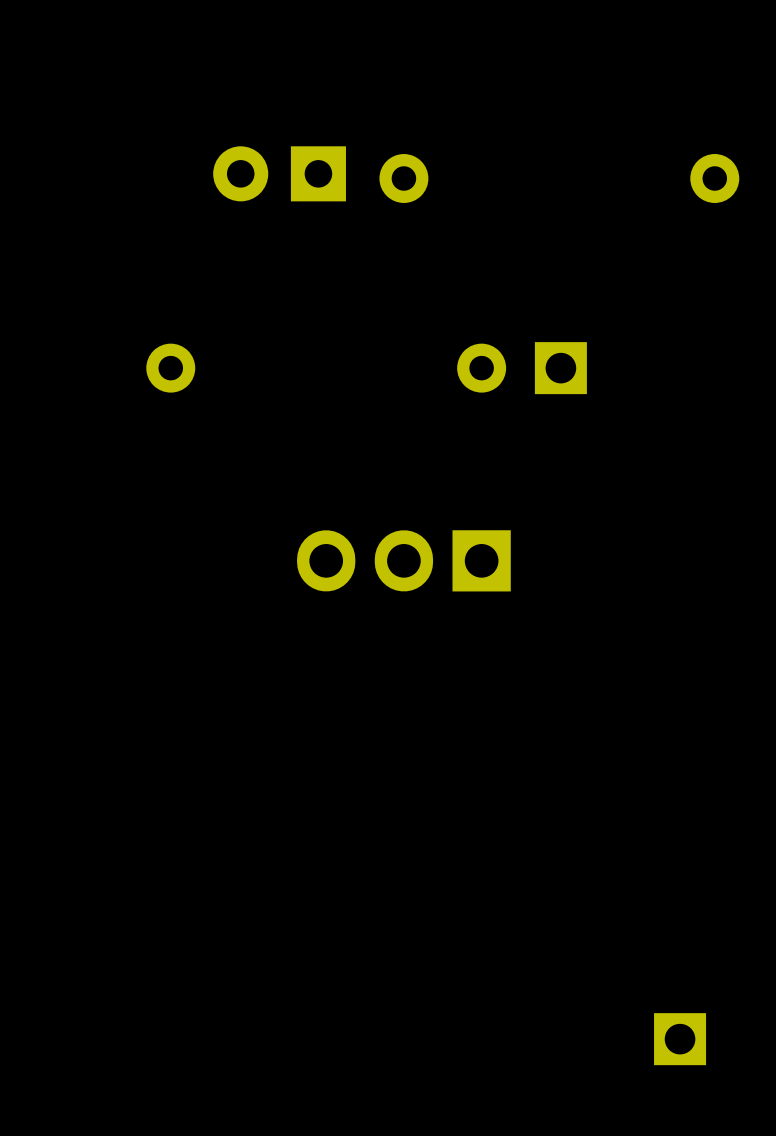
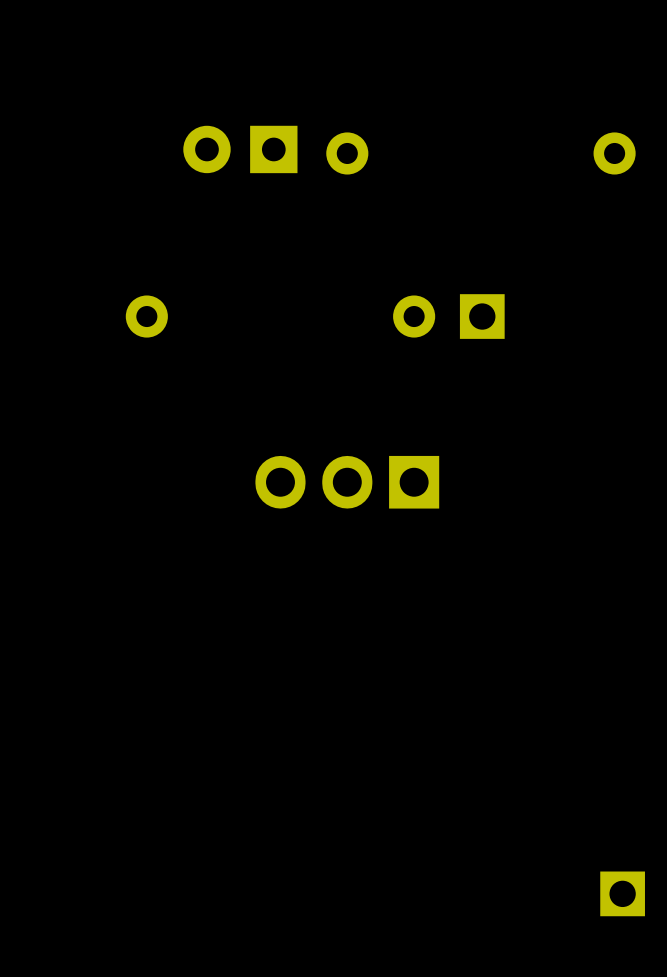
part position: (680, 1039) -> (622, 893)

